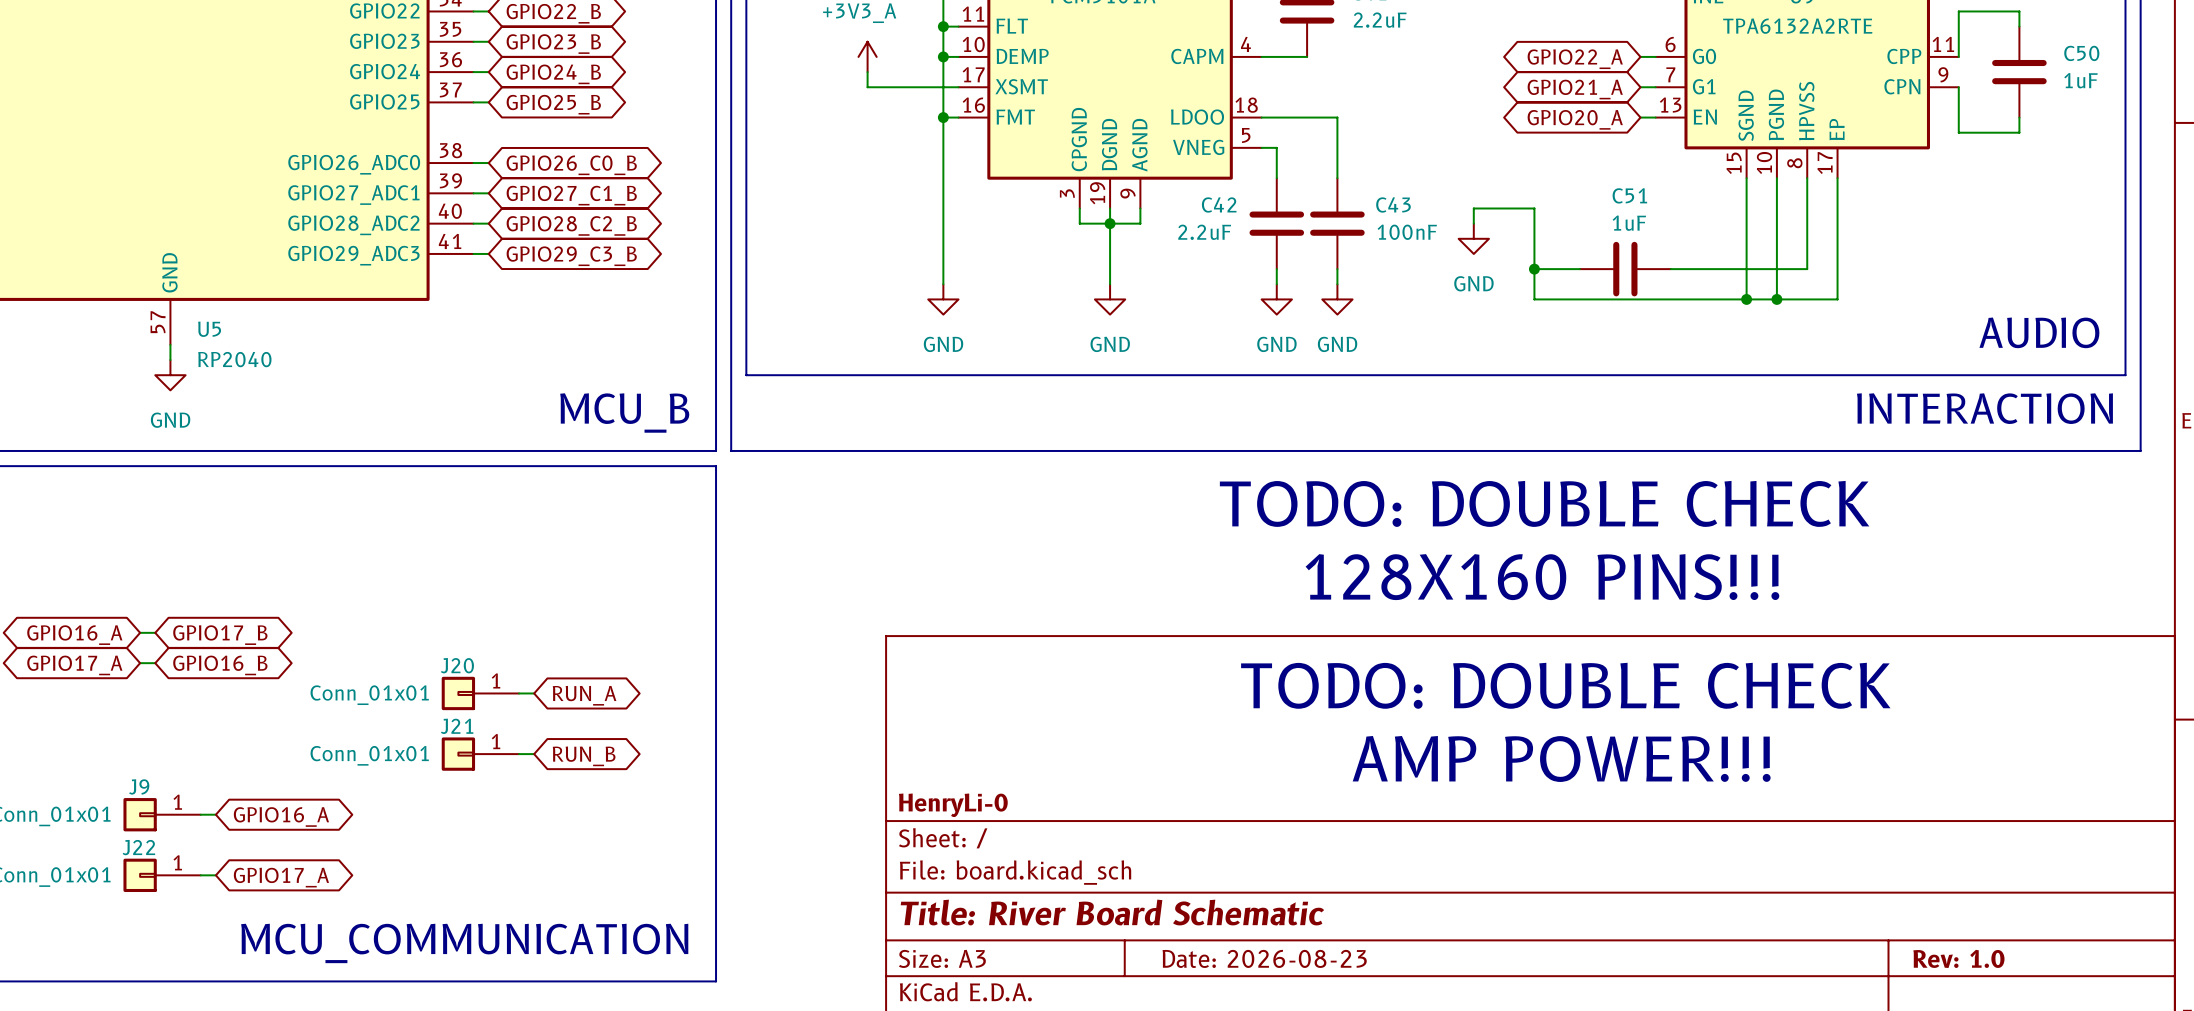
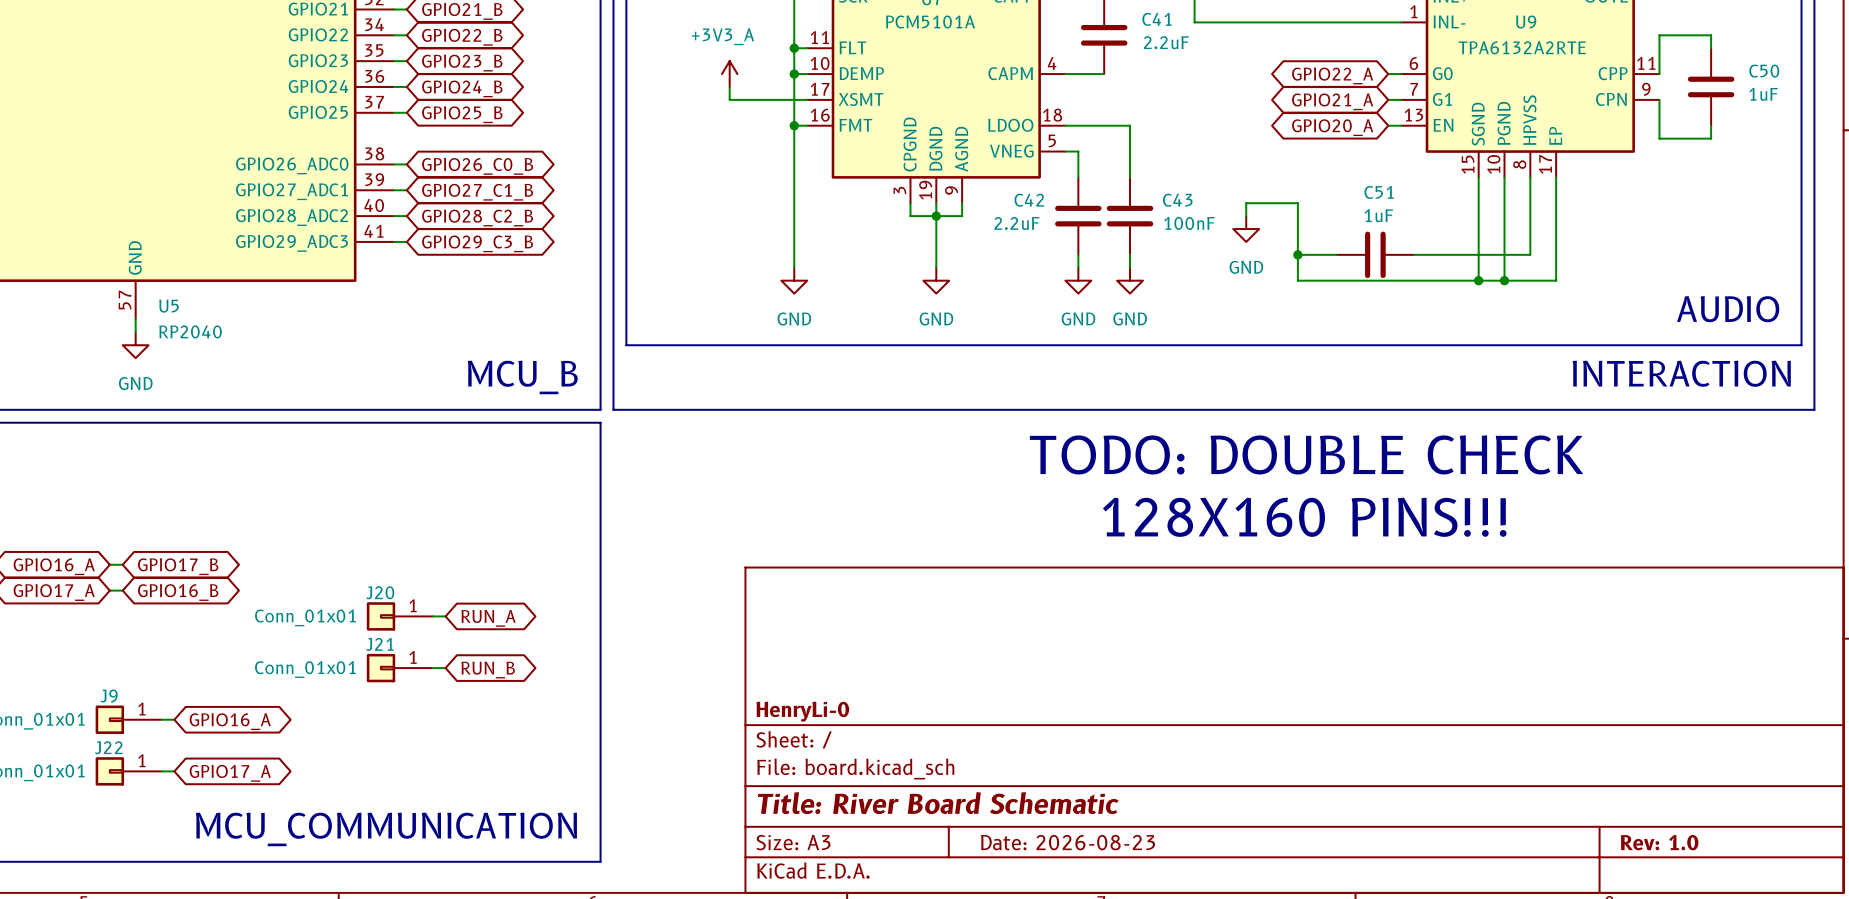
text: TODO: DOUBLE CHECK (1565, 685) -> none
text: AMP POWER!!! (1561, 758) -> none

